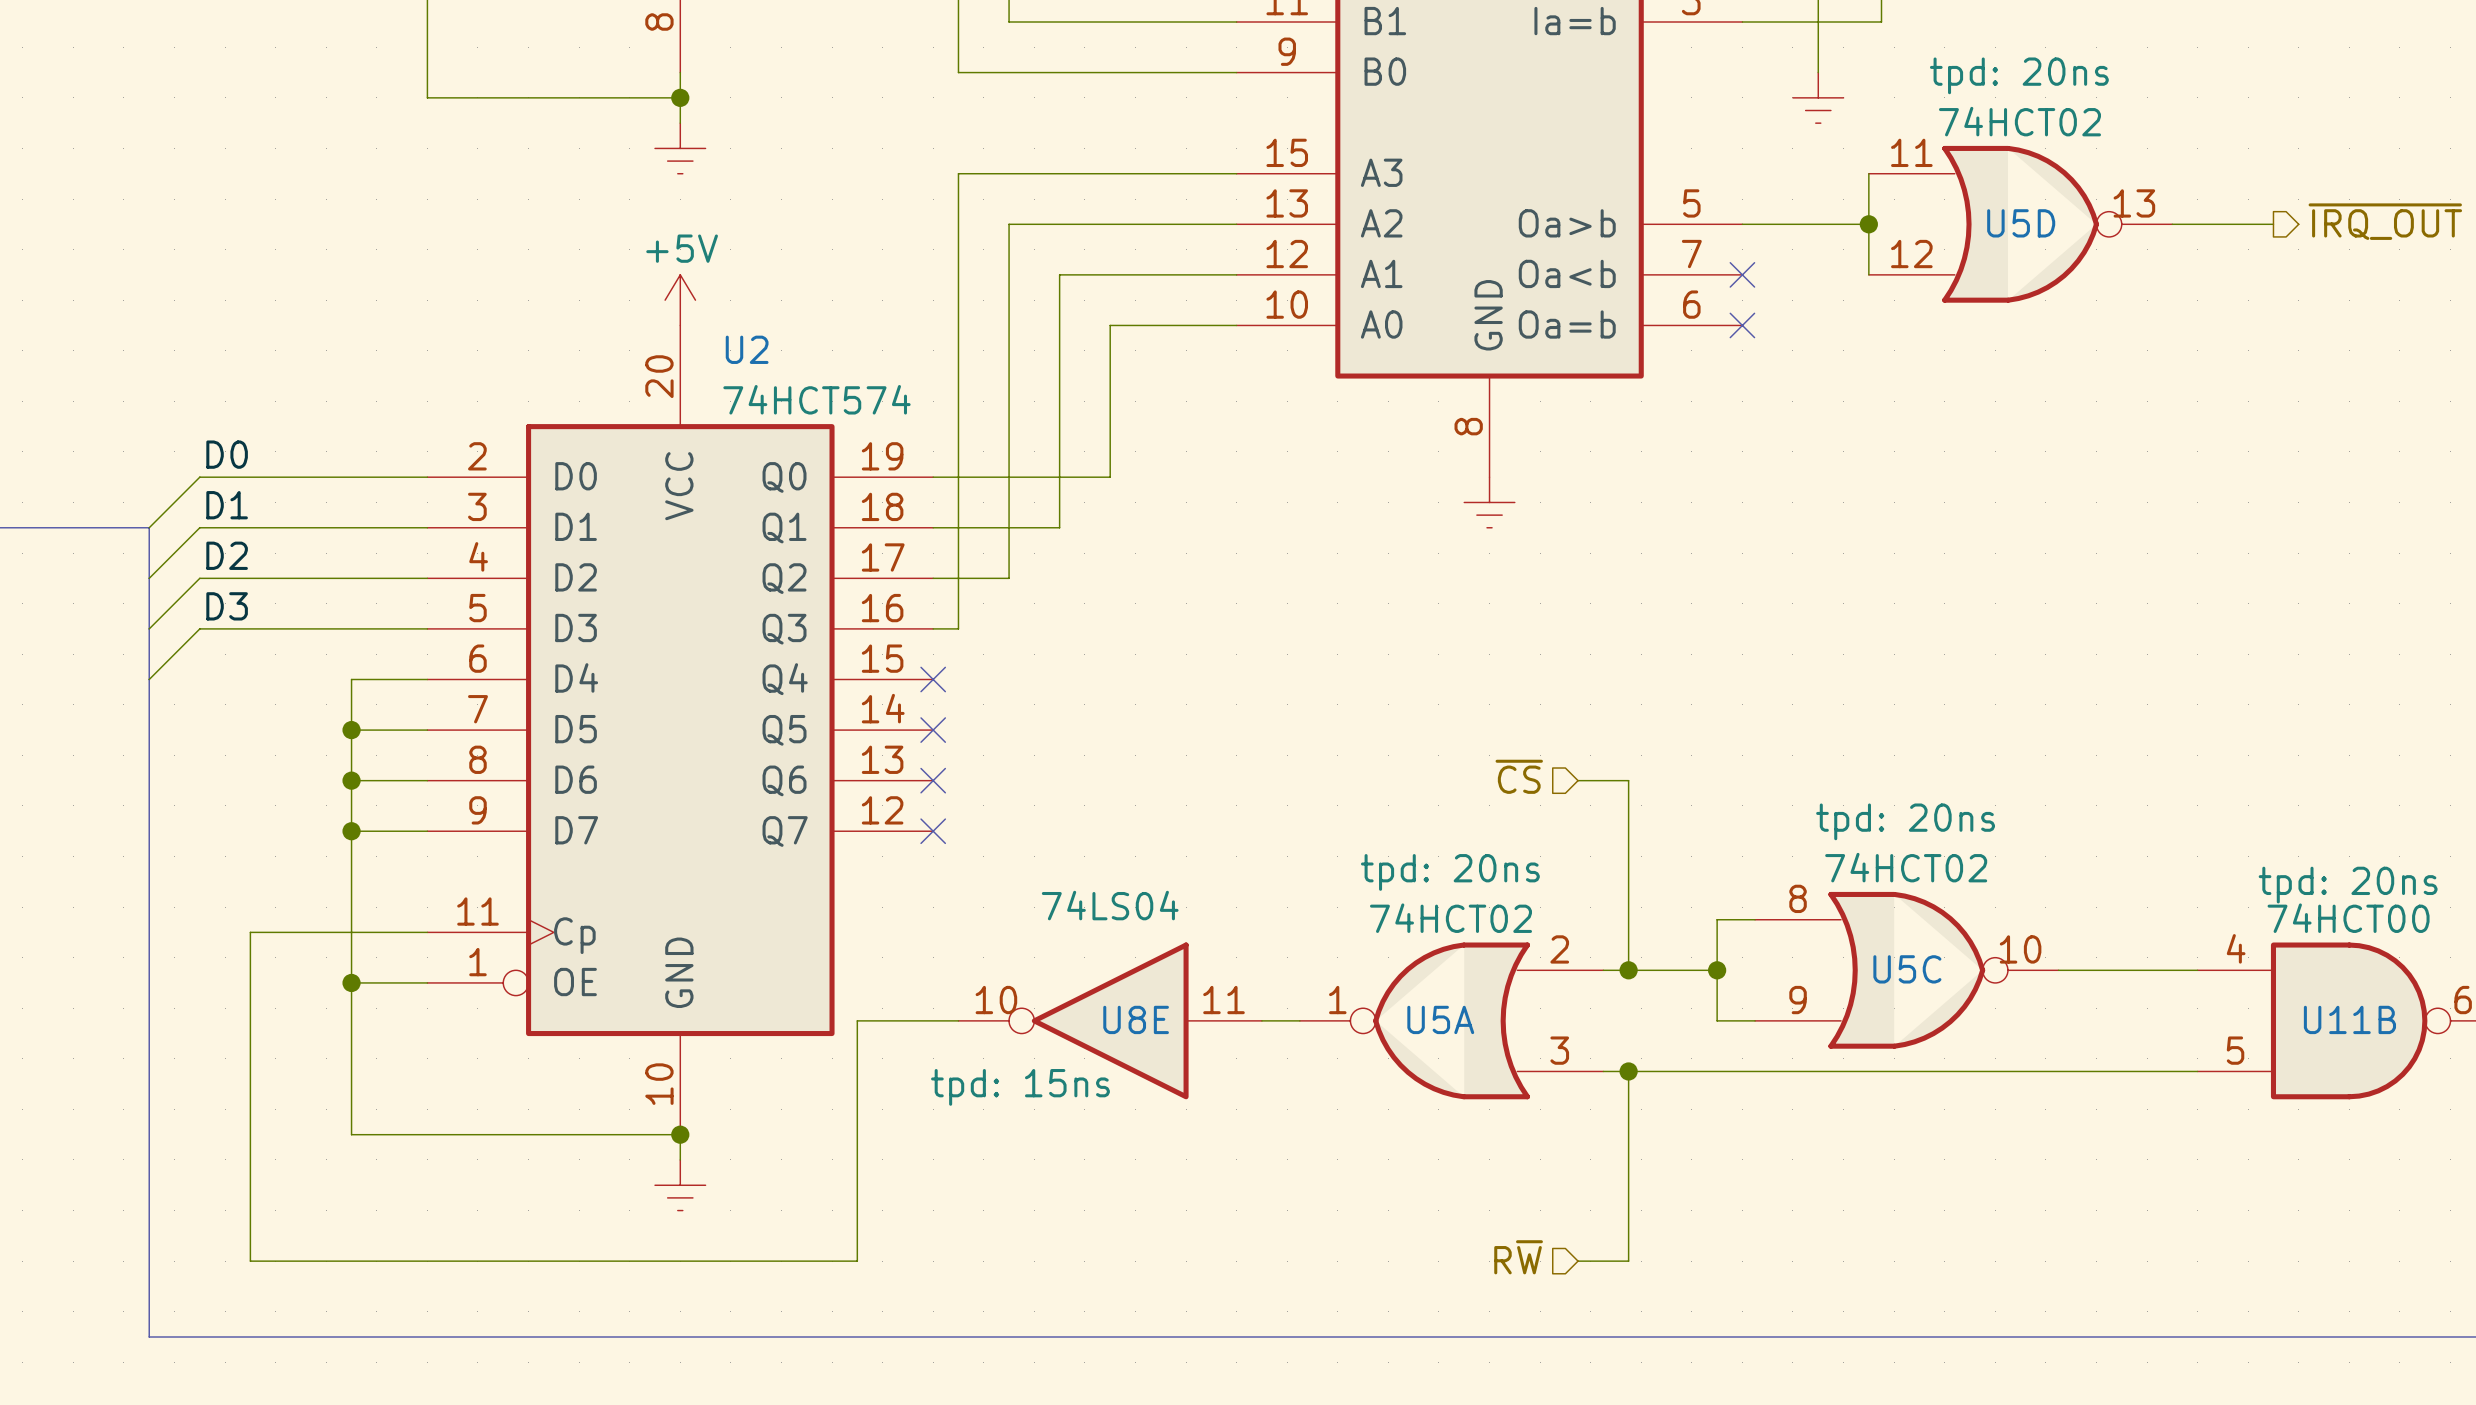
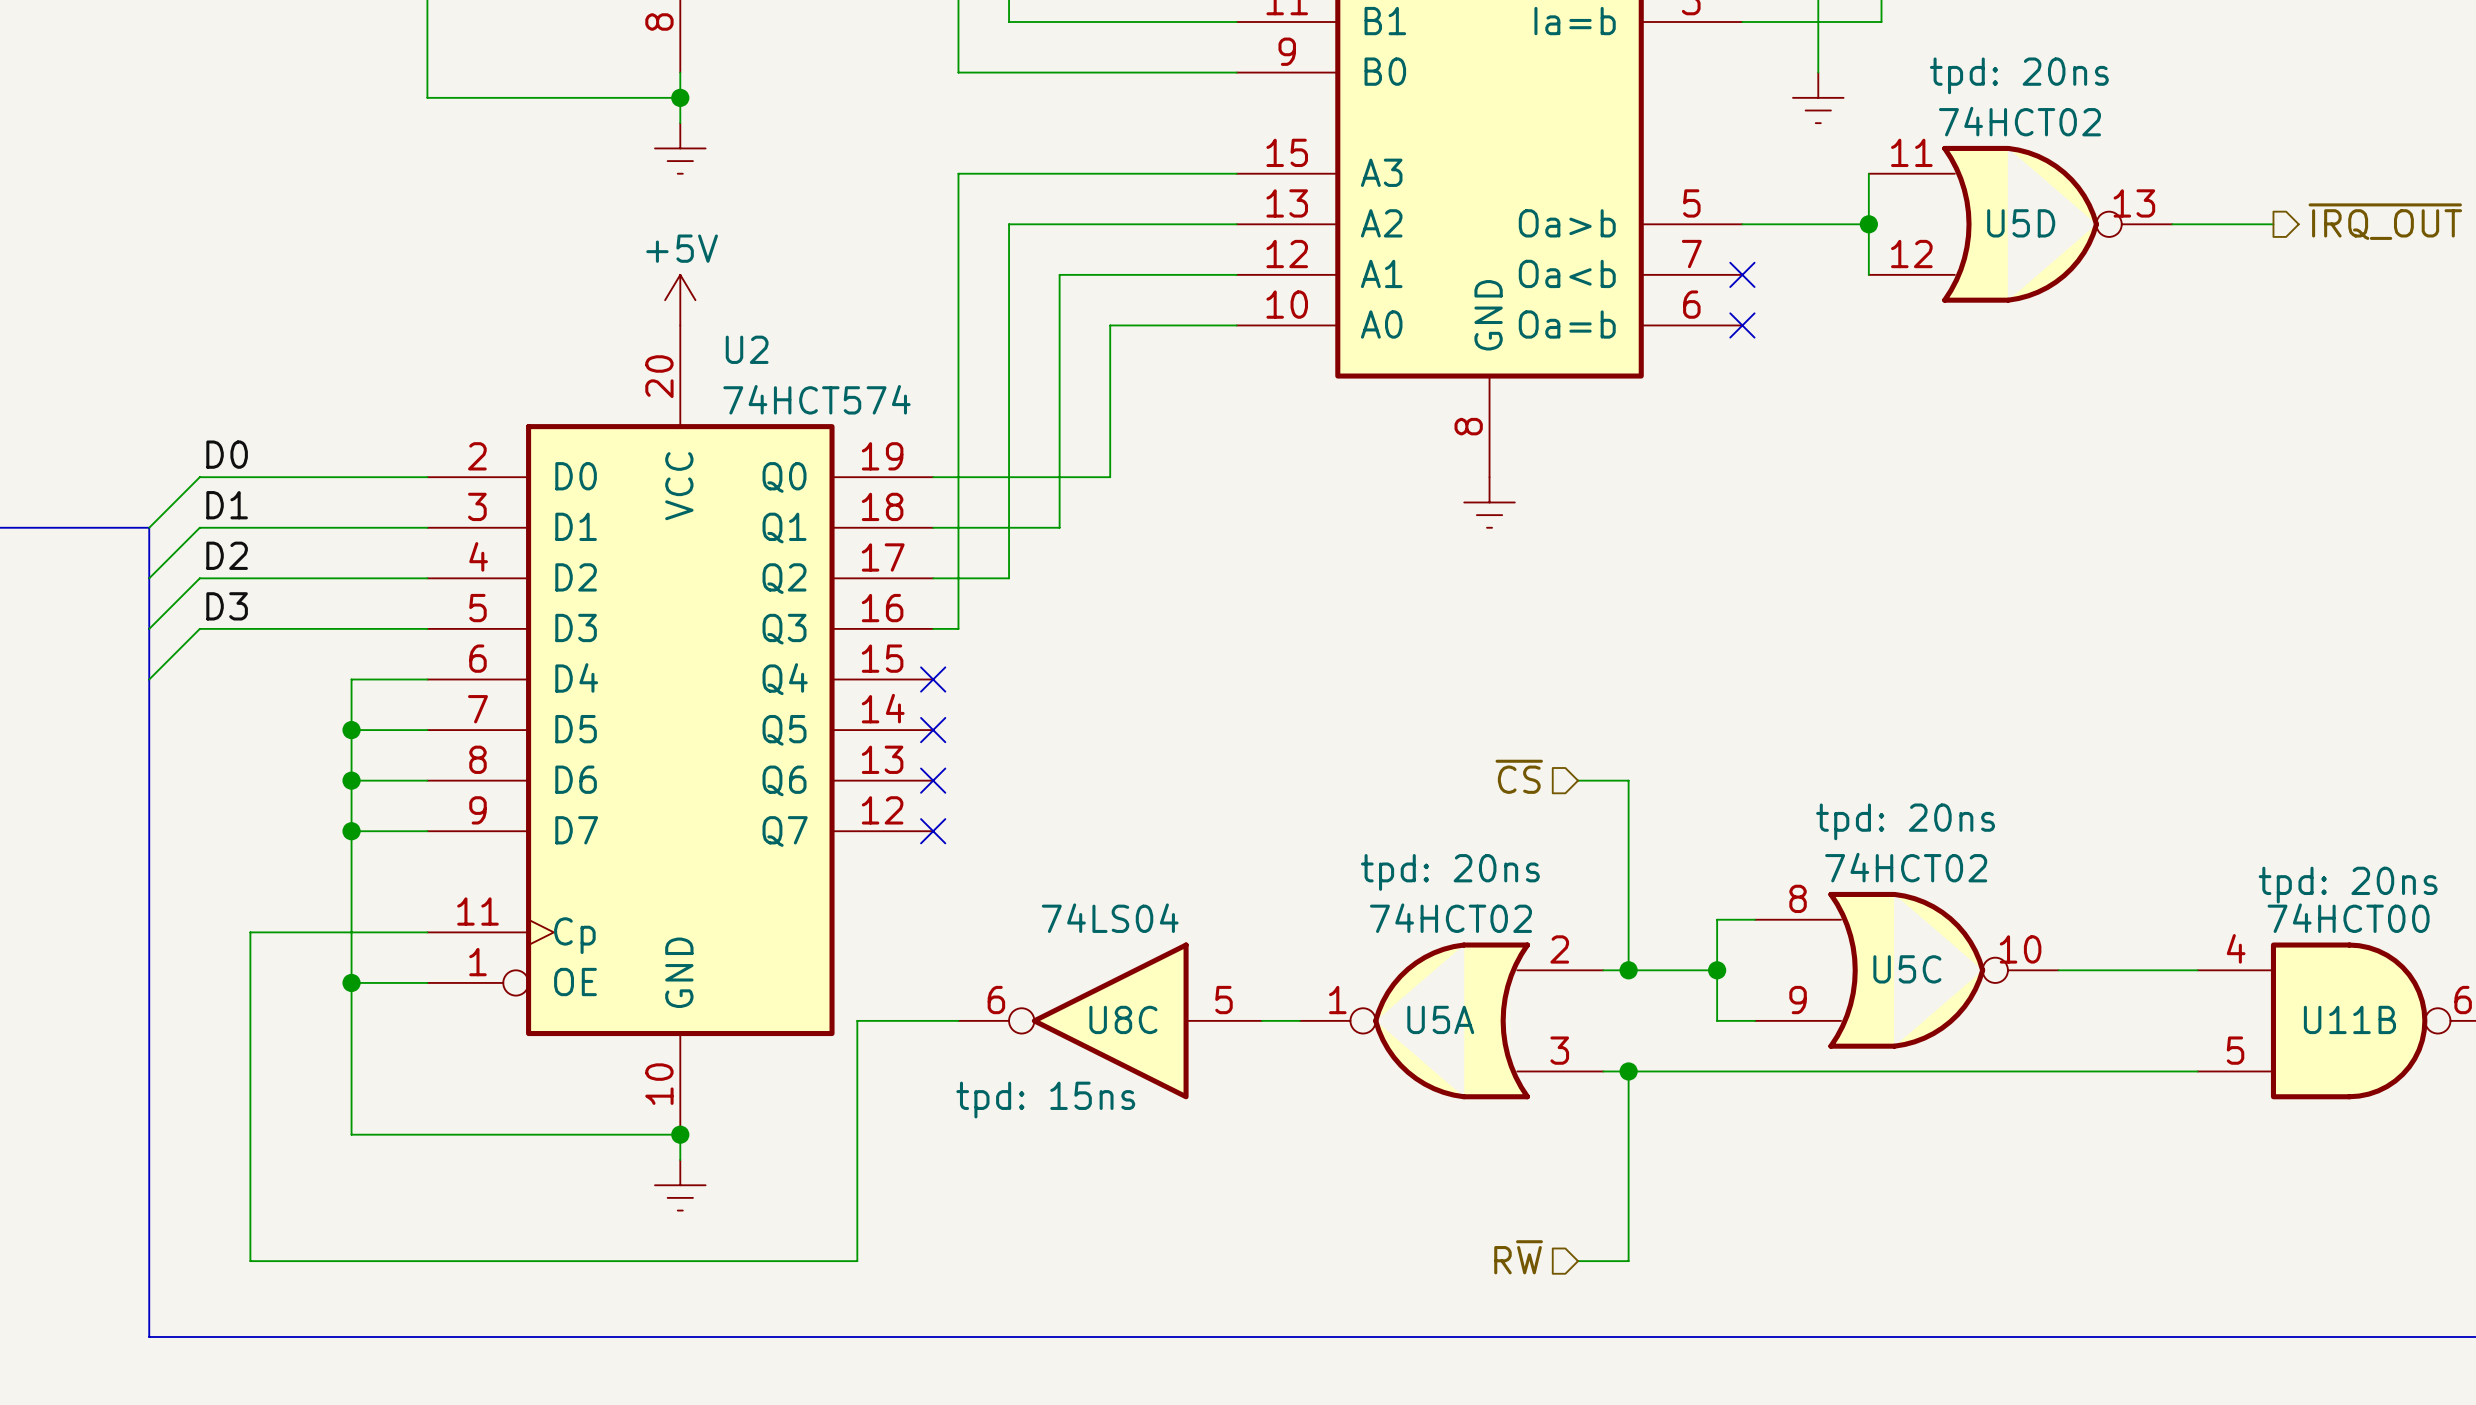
U8E value position: 74LS04 (1110, 905) -> 74LS04 (1110, 918)
U8E pin number: 10 (996, 1000) -> 6 (996, 1000)
U8E pin number: 11 (1224, 1000) -> 5 (1224, 1000)
U8E name: U8E (1136, 1019) -> U8C (1123, 1019)
U8E text position: tpd: 15ns (1020, 1087) -> tpd: 15ns (1045, 1100)

